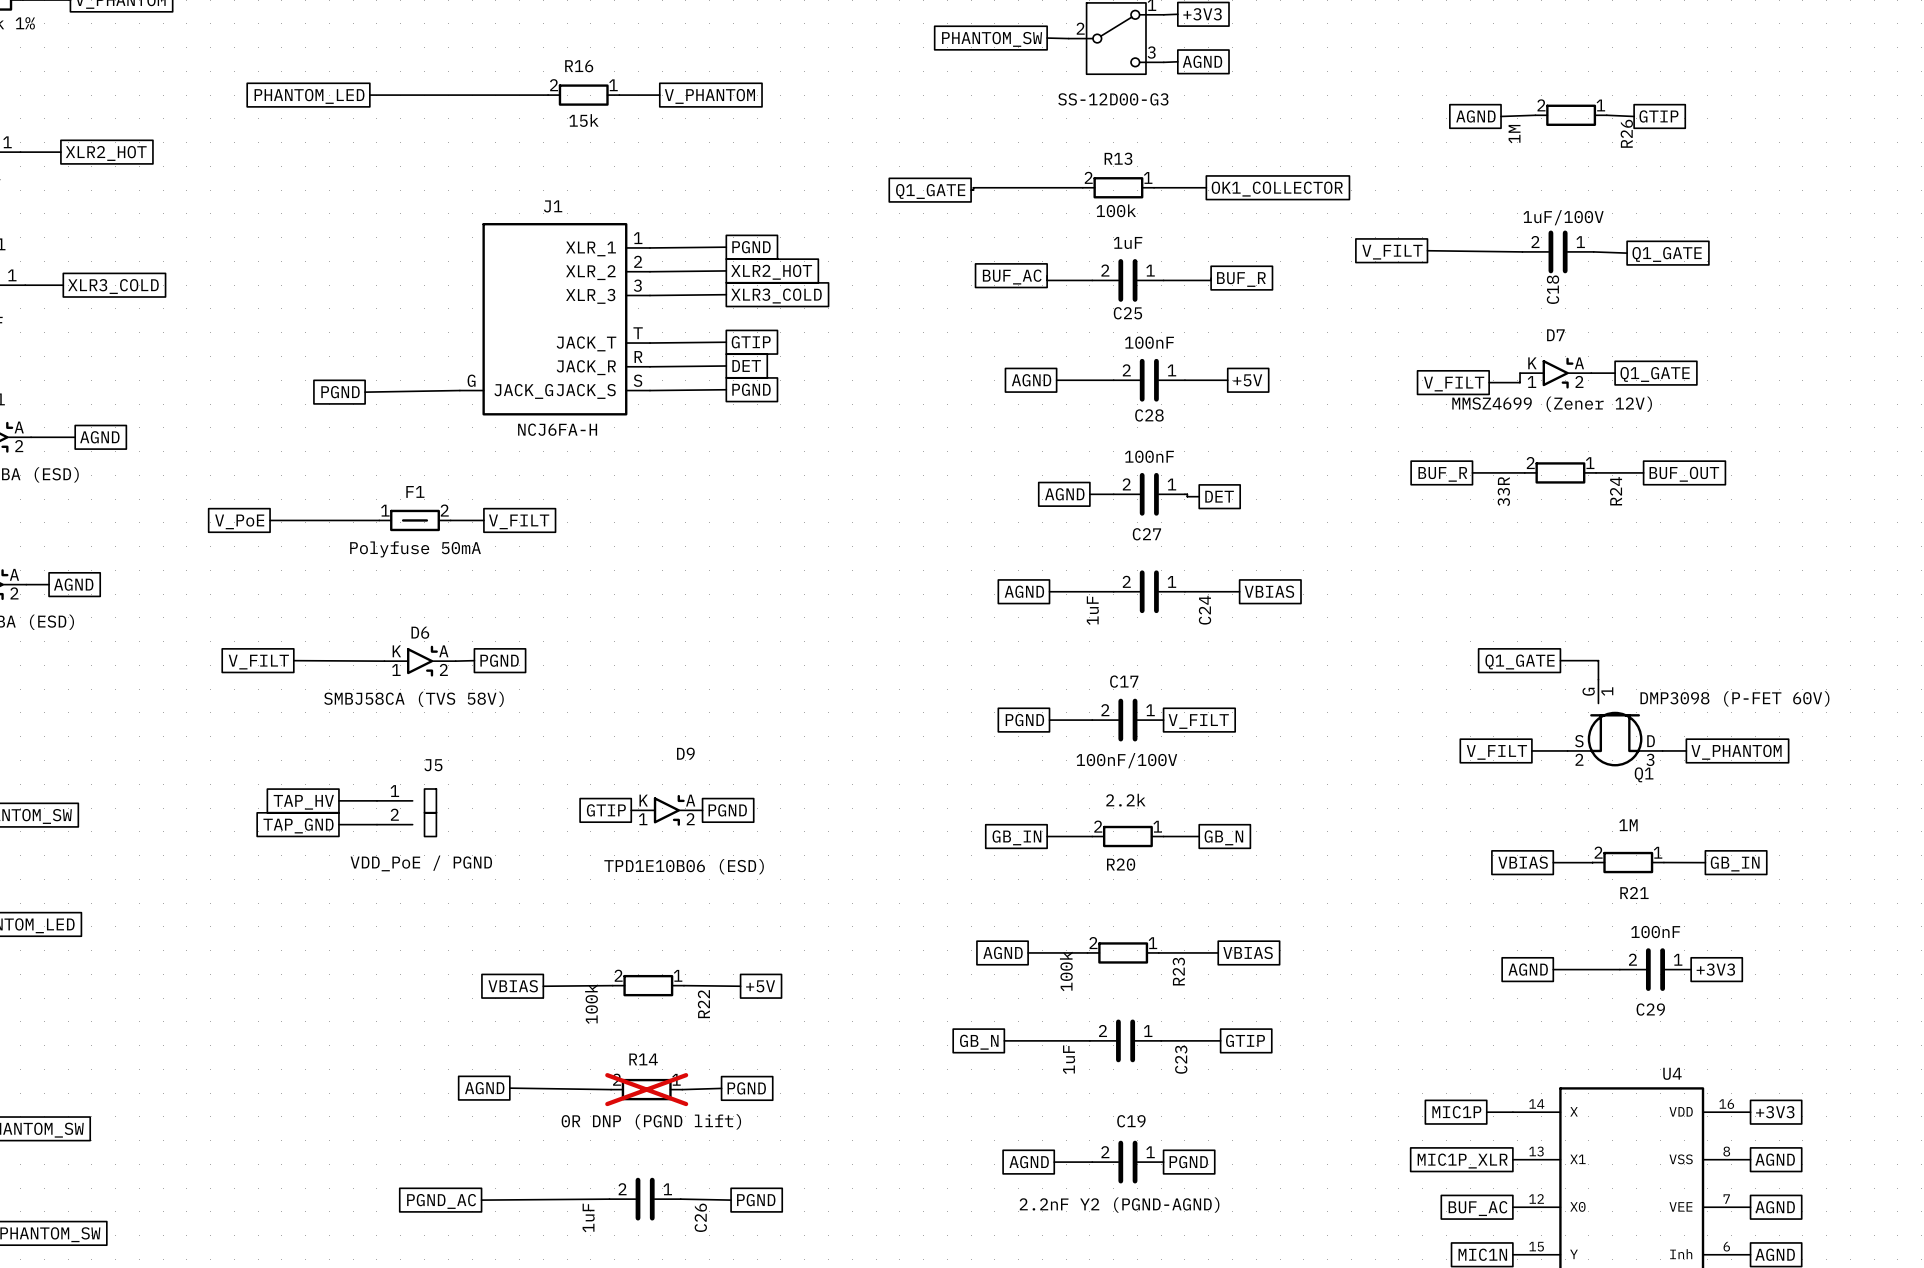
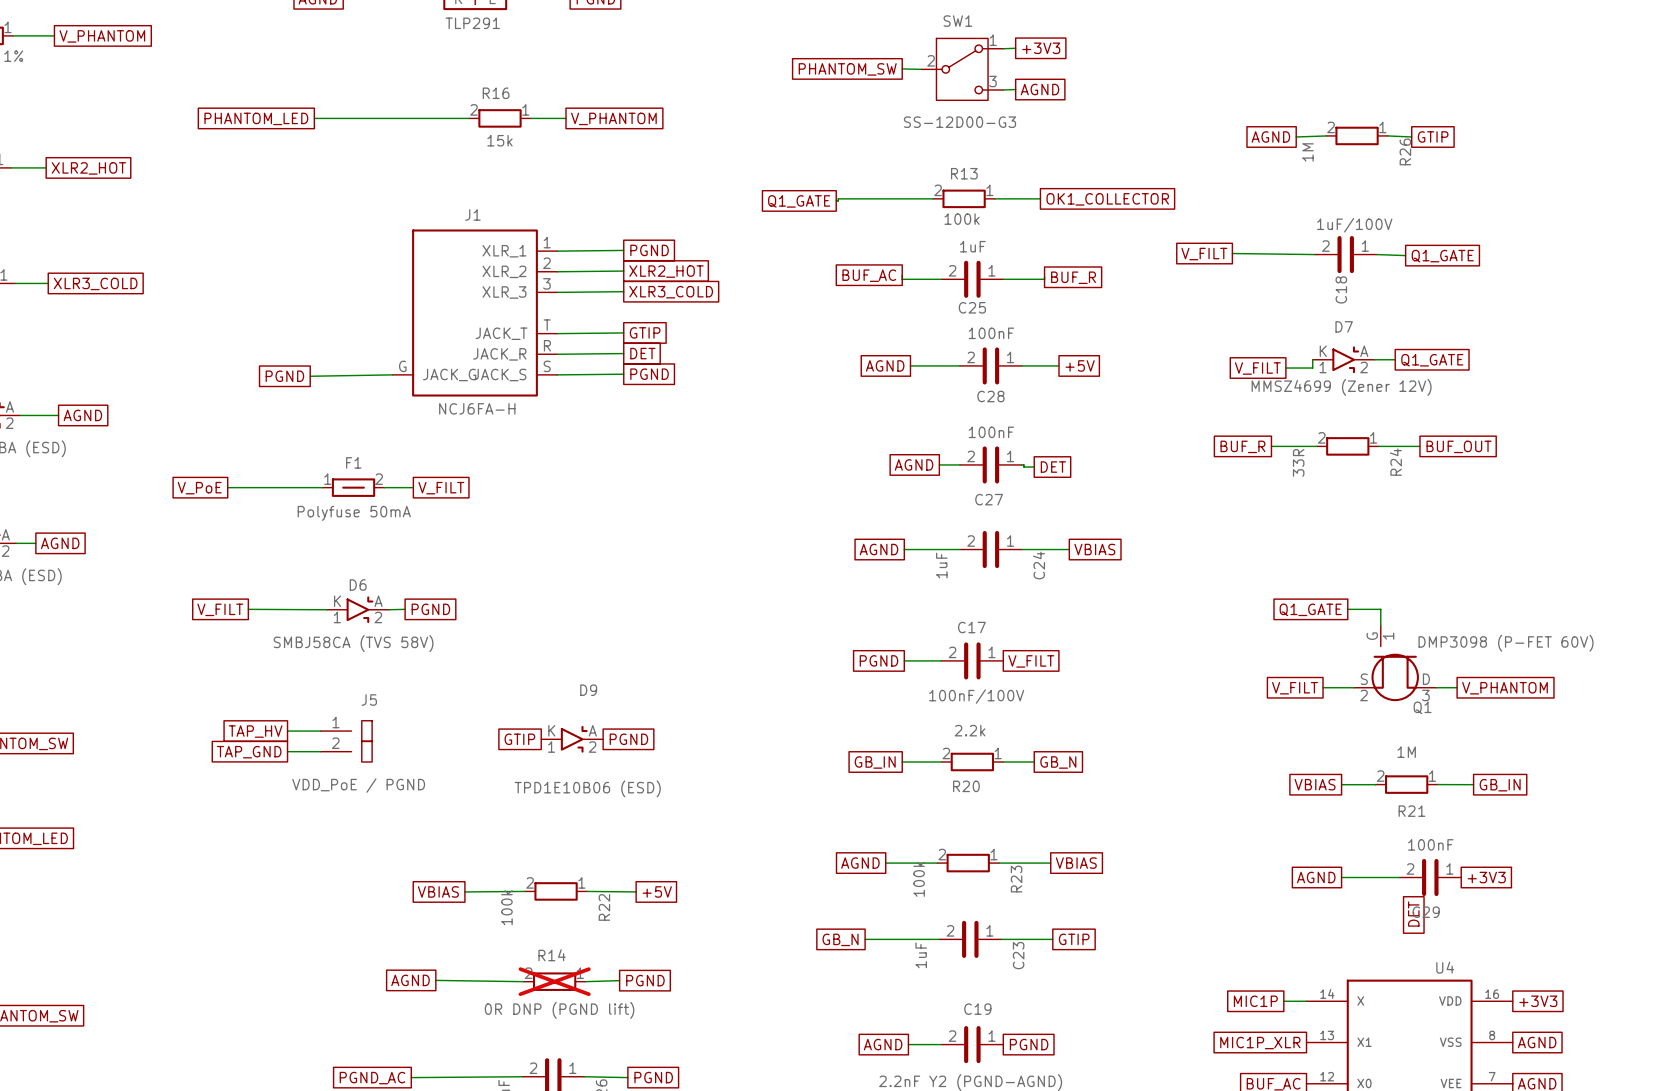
global label: none -> DET (1413, 914)

